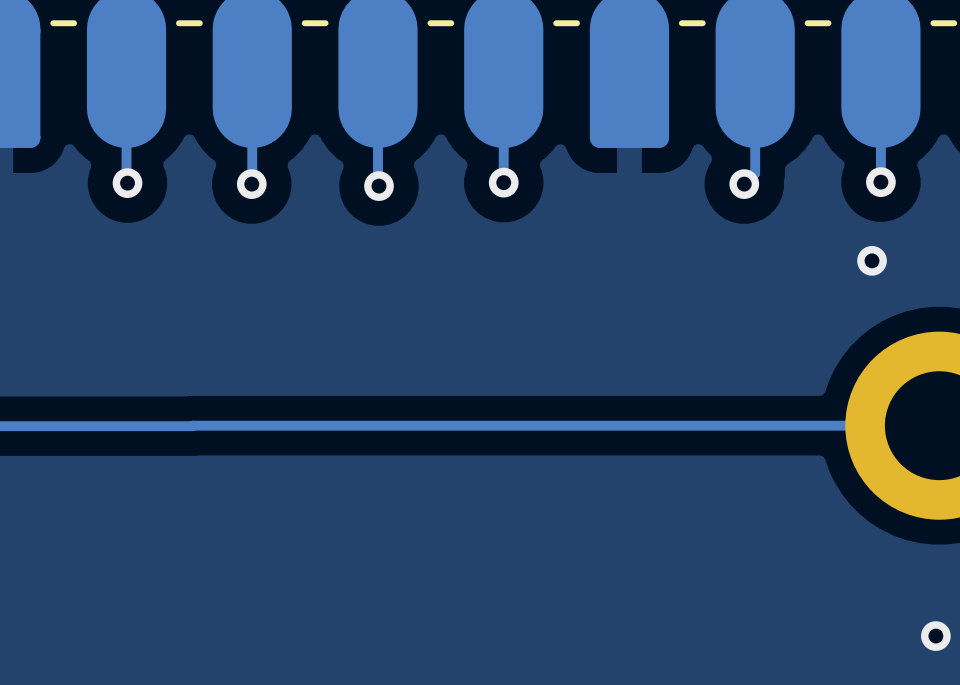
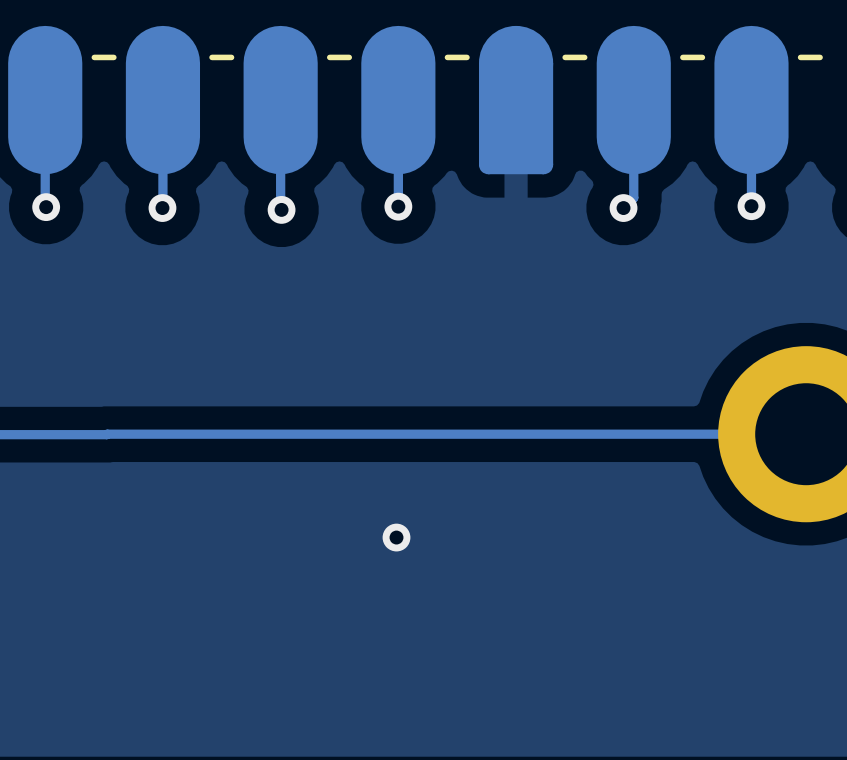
via: (872, 260) -> none
via: none -> (396, 537)
via: (935, 636) -> none

